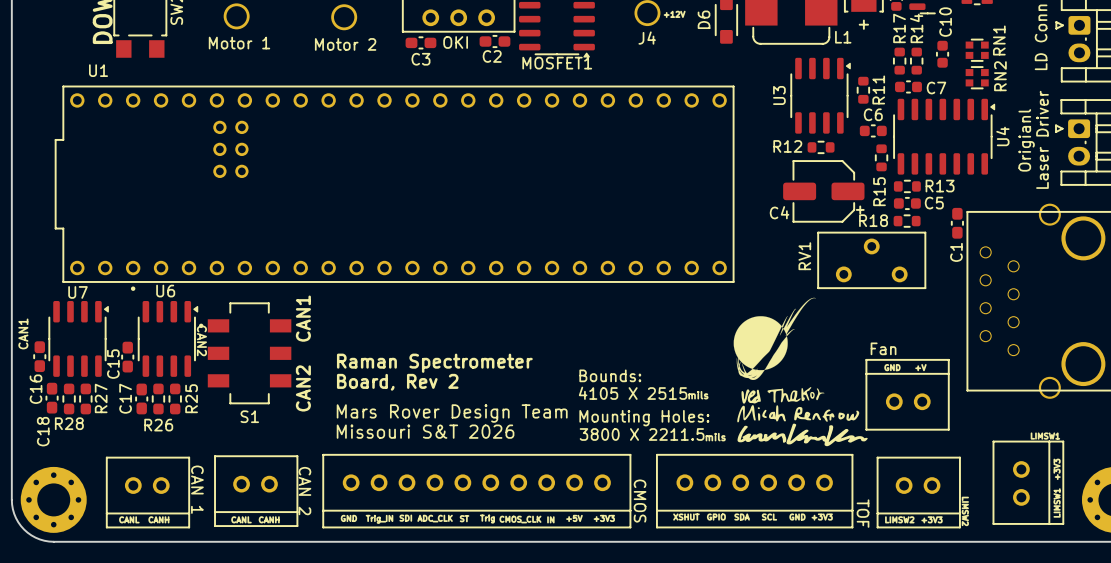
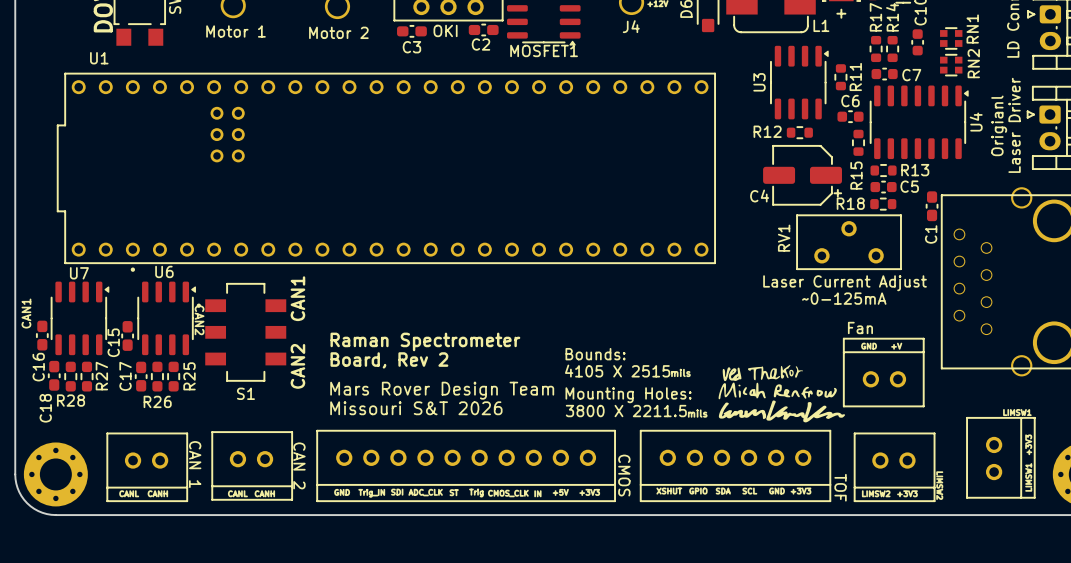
drawing: [733, 297, 816, 381] -> none
text: none -> Laser Current Adjust (845, 283)
text: none -> ~0-125mA (844, 298)

